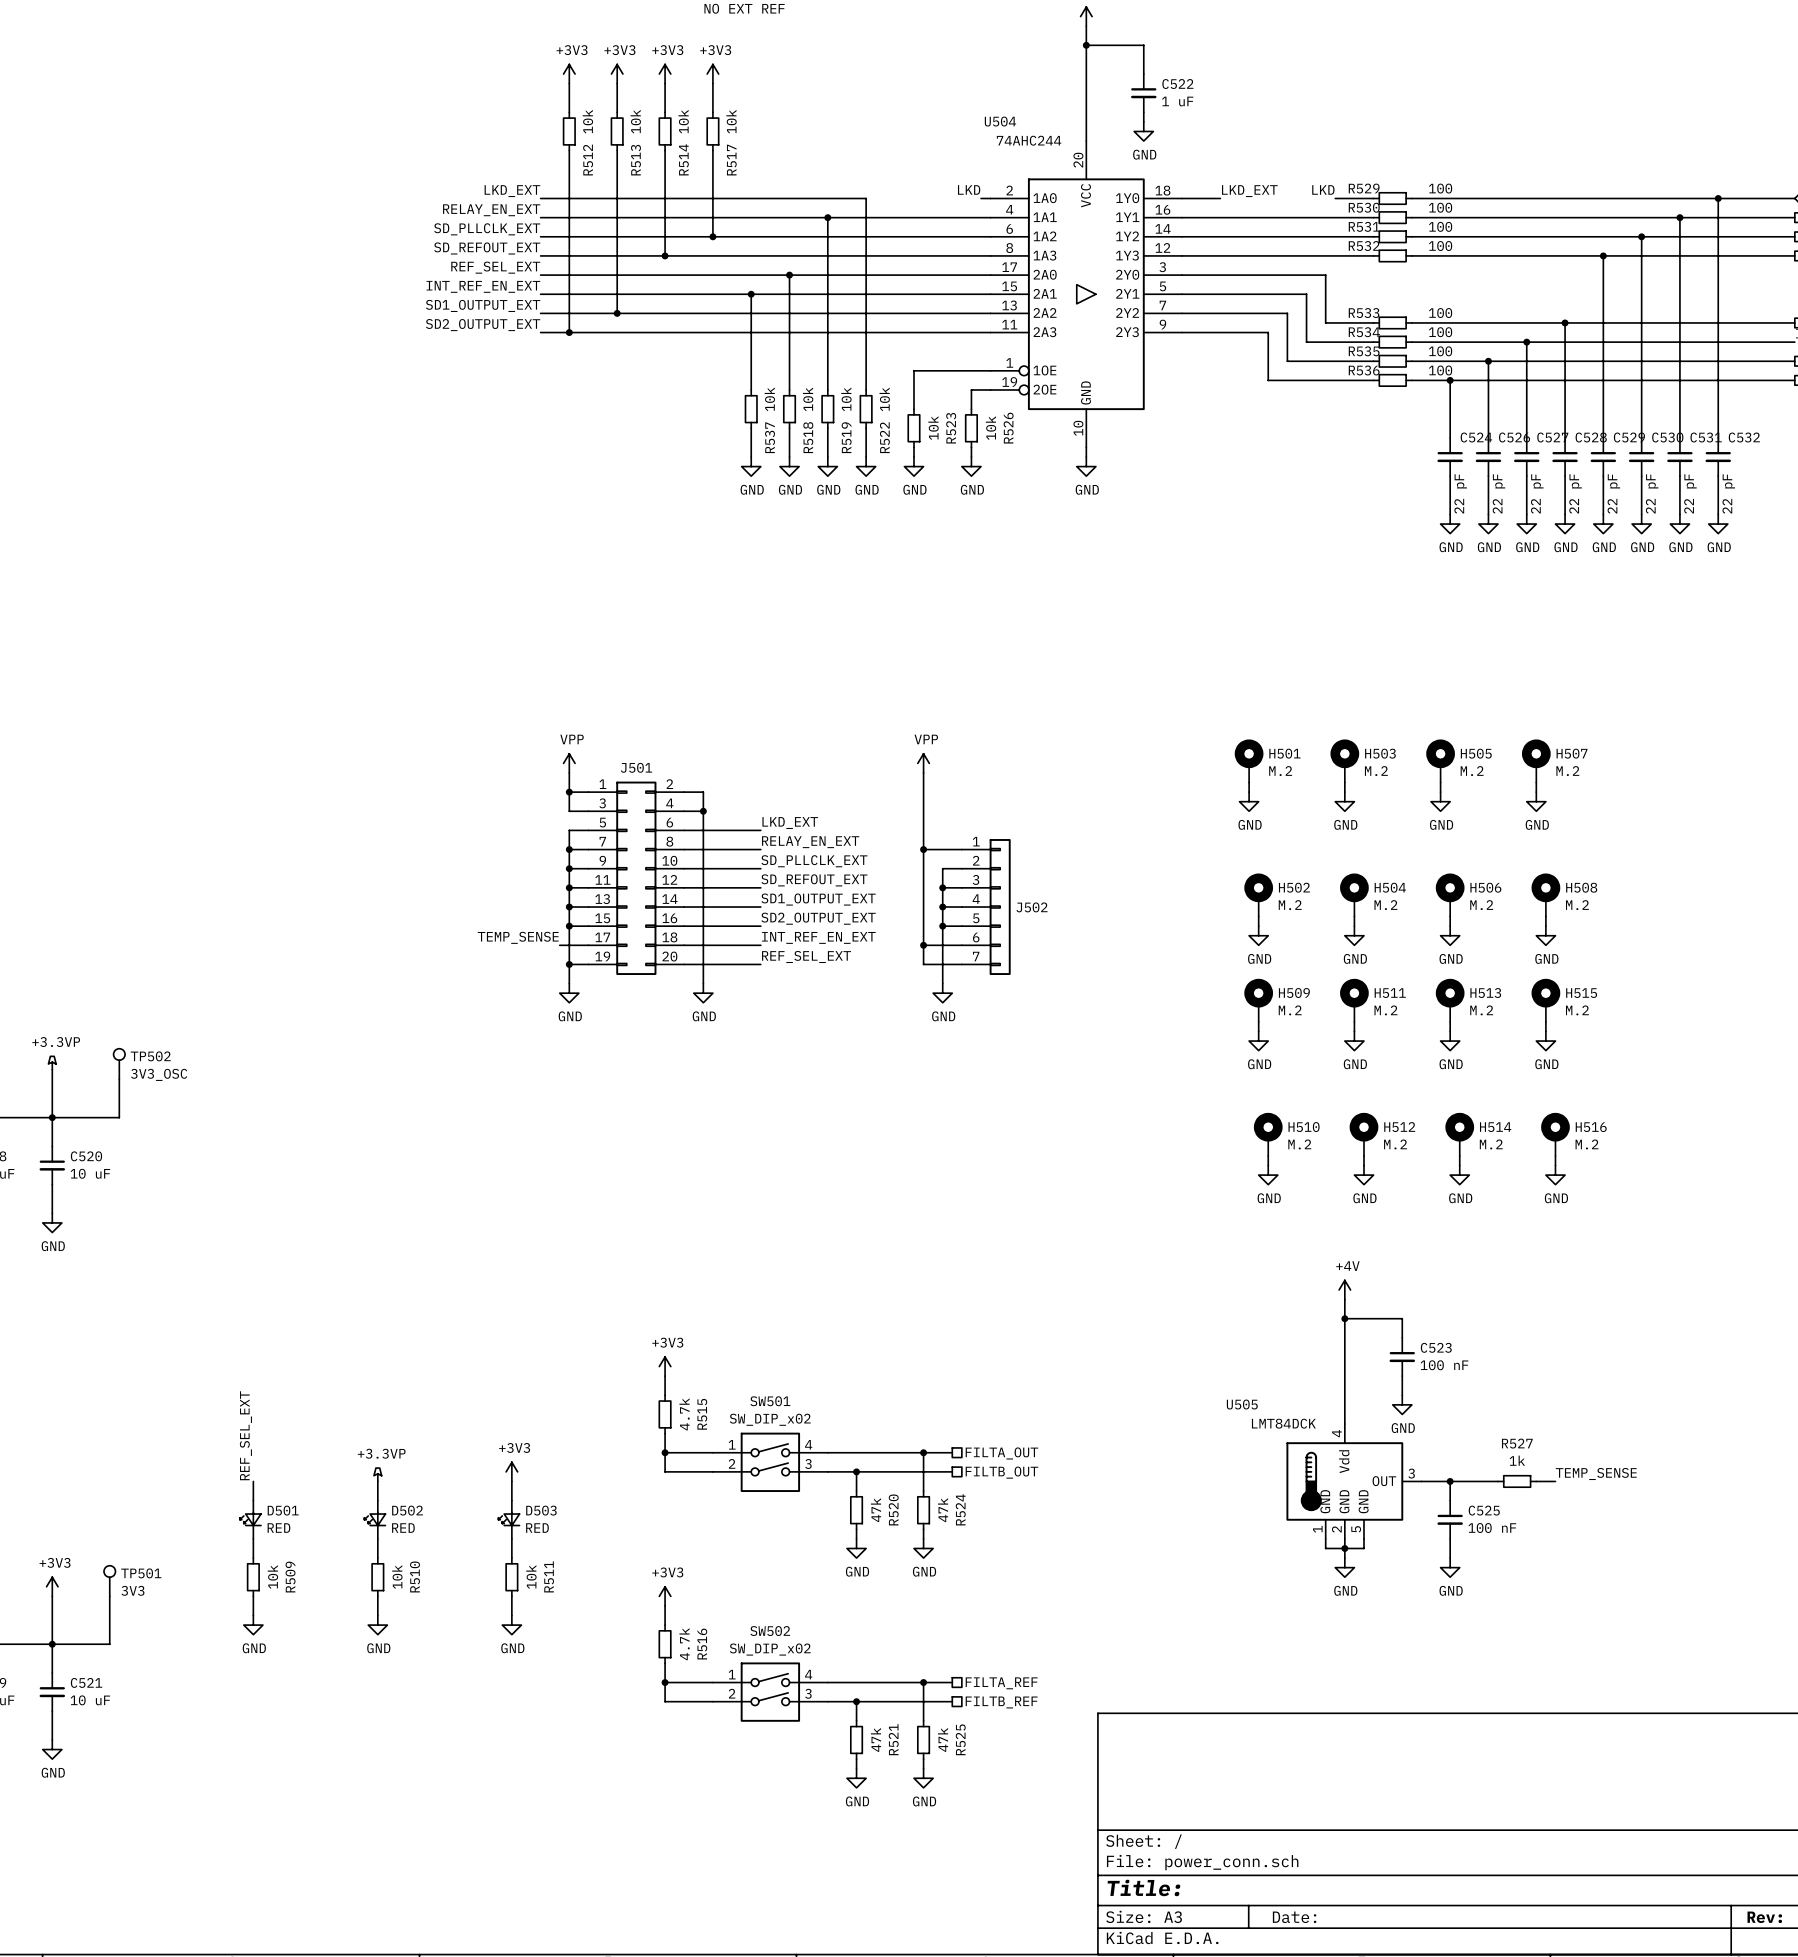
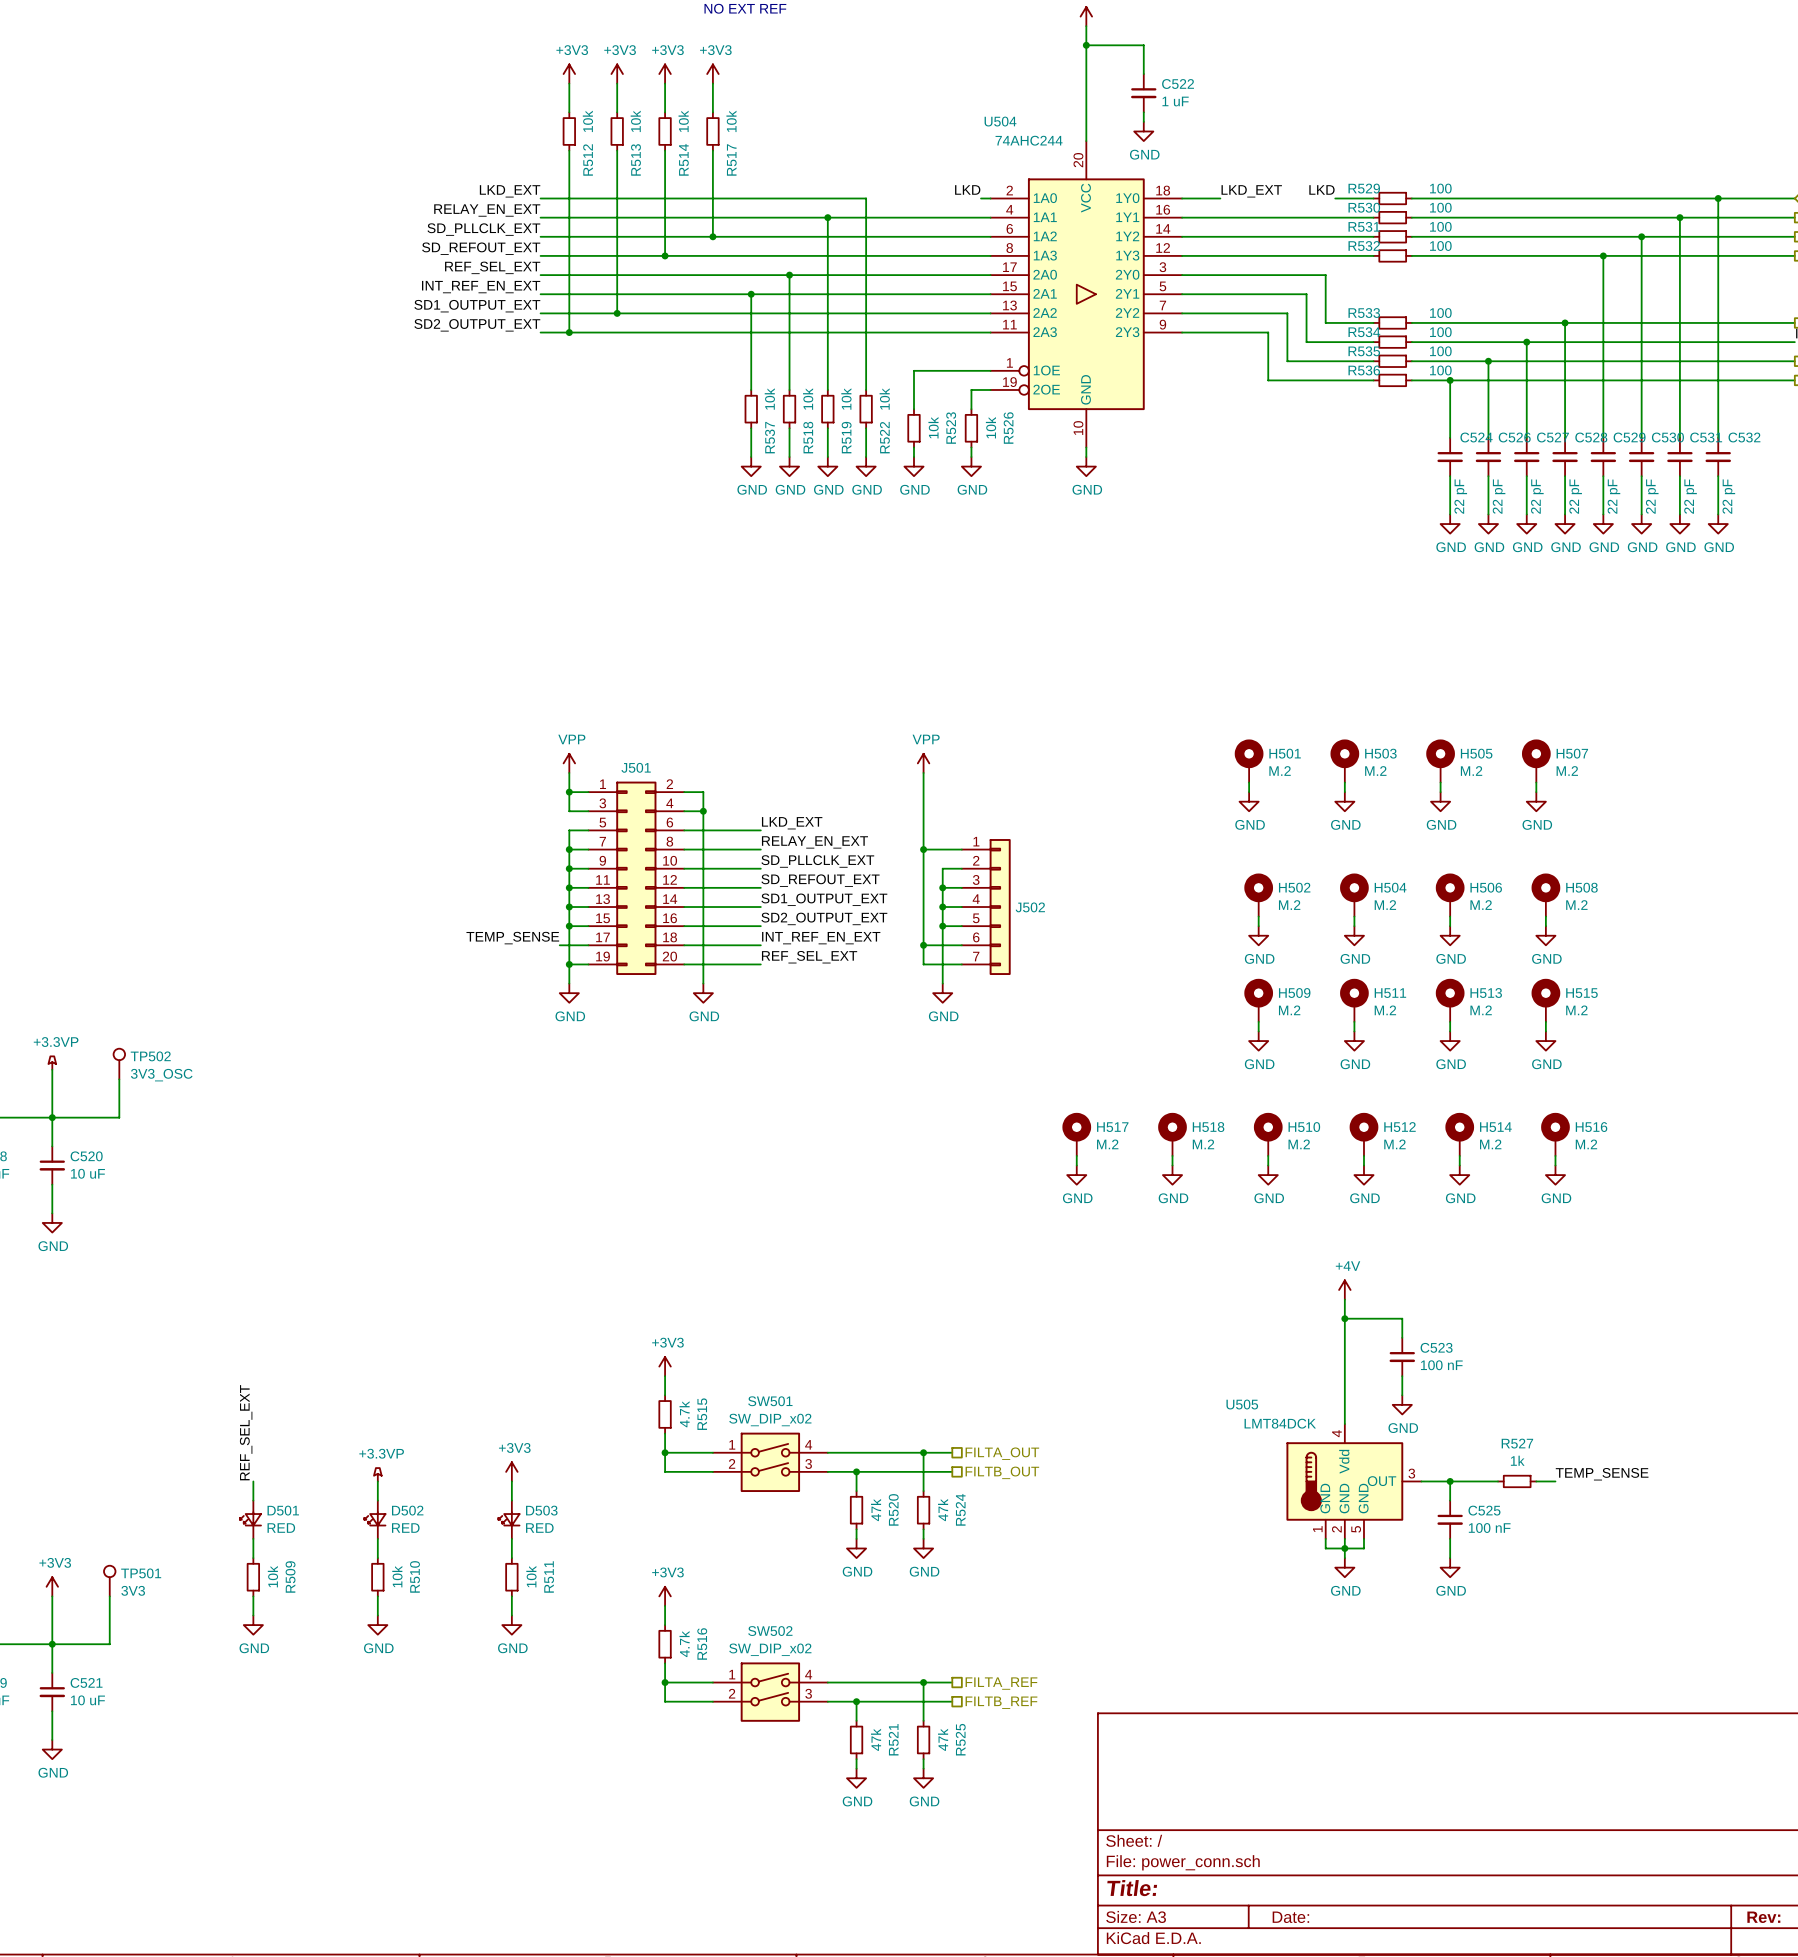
H517: none -> M.2 (1076, 1134)
H518: none -> M.2 (1172, 1134)
wire: none -> (1076, 1155) (1076, 1165)
wire: none -> (1172, 1155) (1172, 1165)
power symbol: none -> GND (1076, 1175)
power symbol: none -> GND (1172, 1175)

